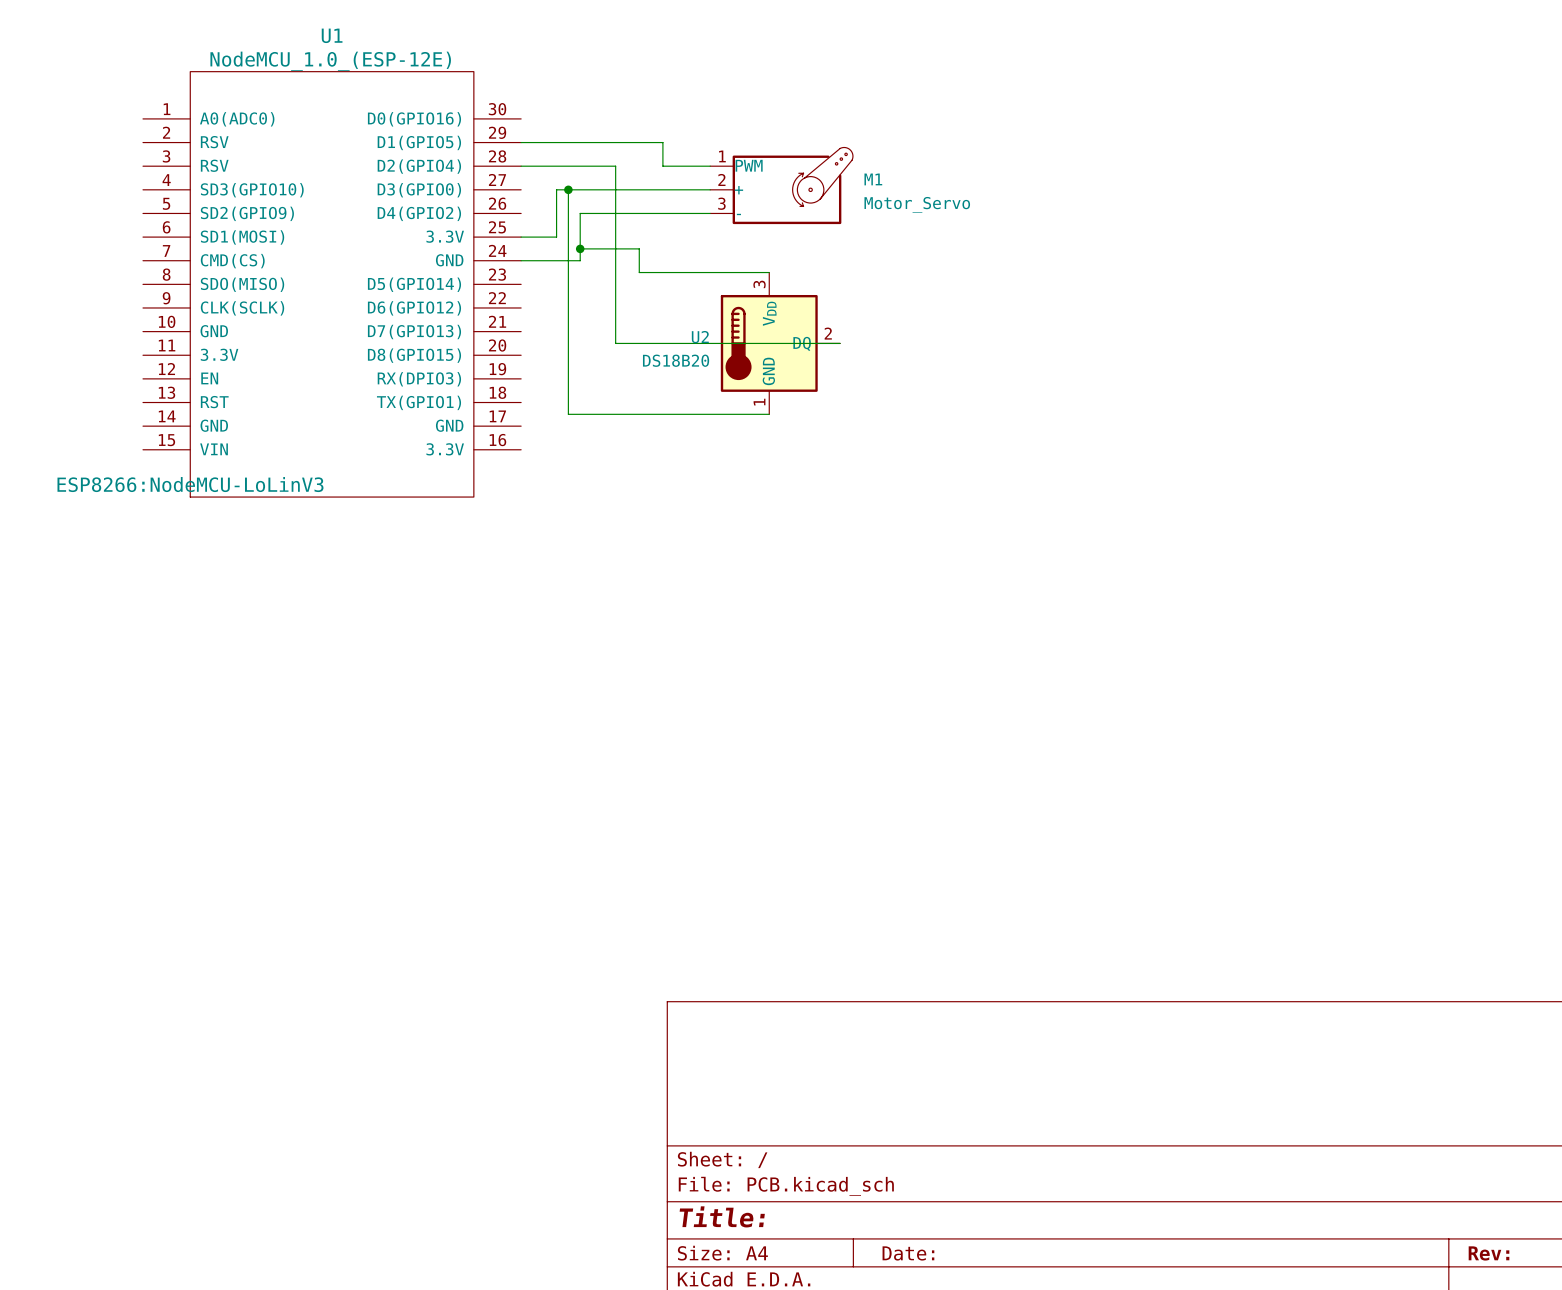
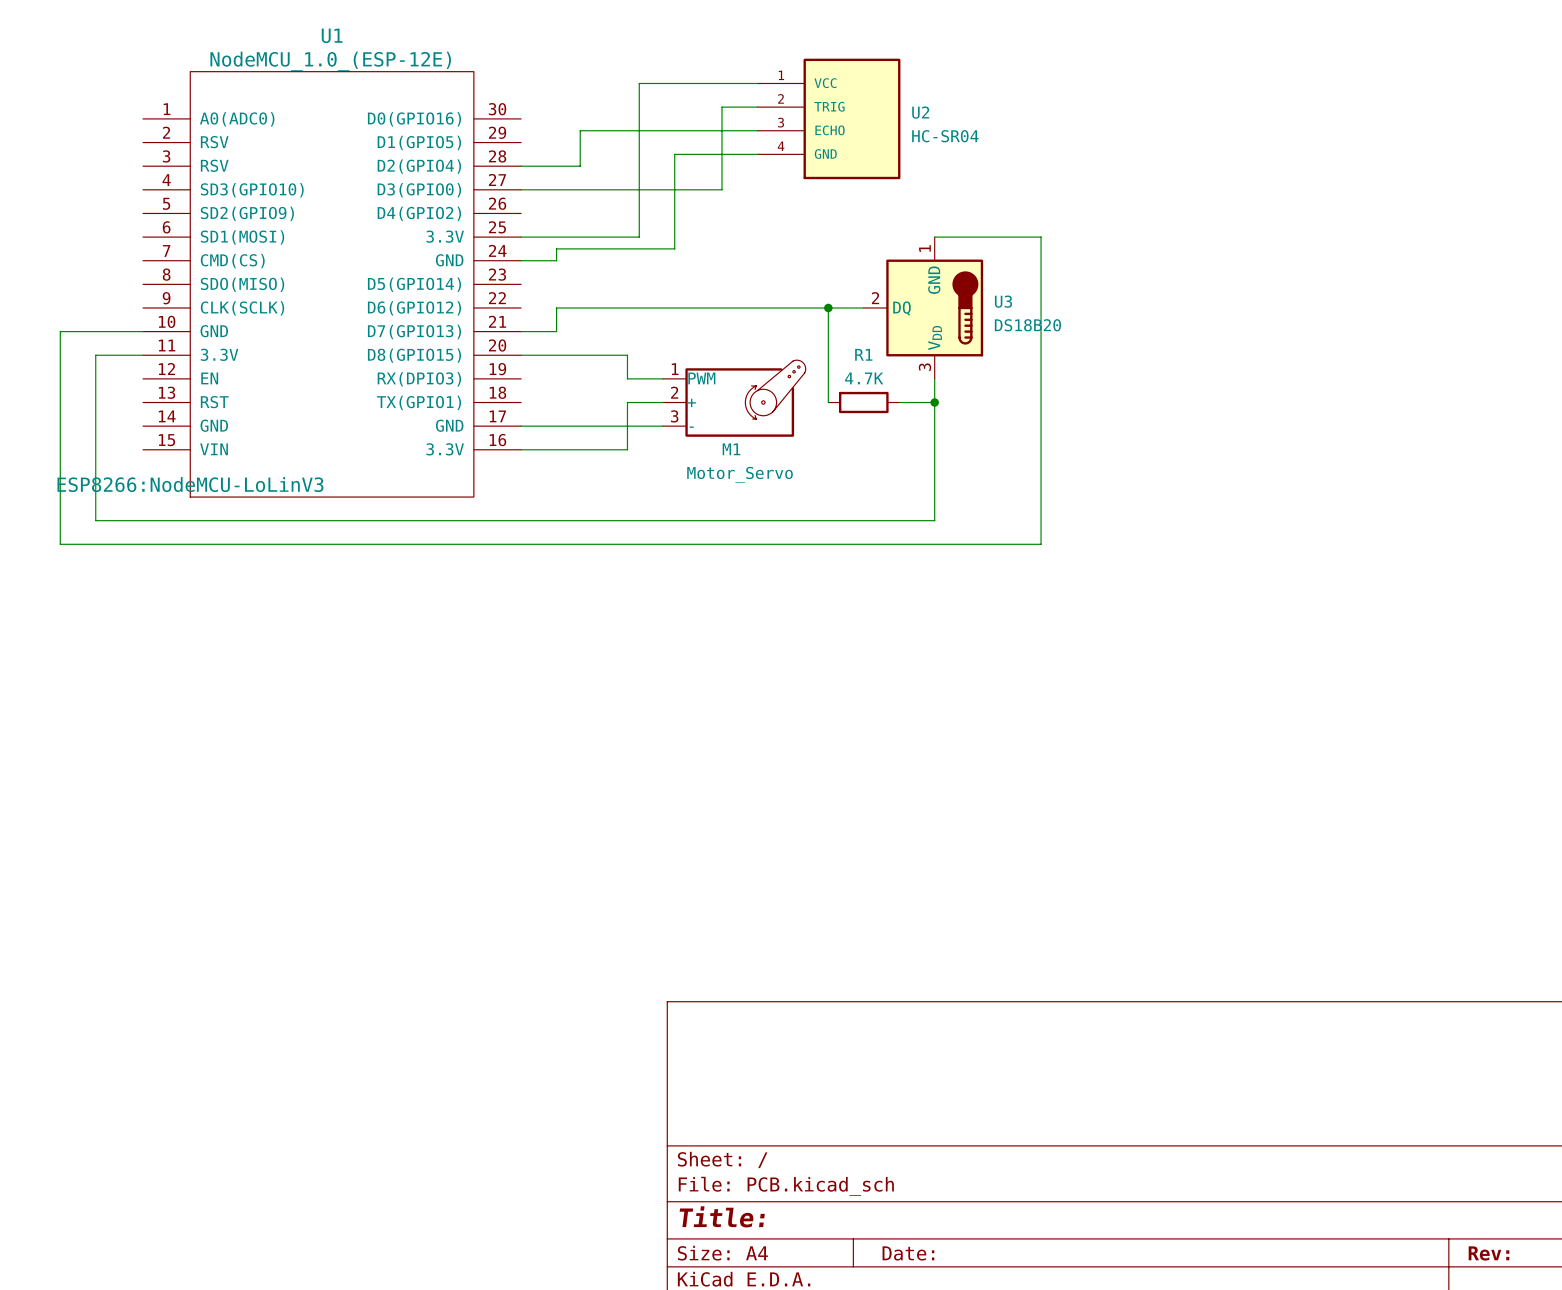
wire: none -> (757, 83) (639, 83) (639, 237) (556, 237)
wire: none -> (757, 107) (722, 107) (722, 189) (710, 189)
wire: (521, 142) (662, 142) (662, 166) (710, 166) -> none
wire: (580, 166) (615, 166) (615, 343) (840, 343) -> (580, 166) (580, 130) (757, 130)
M1 name position: M1 (873, 179) -> M1 (731, 449)
M1 position: (781, 185) -> (734, 398)
wire: (556, 189) (556, 237) -> (556, 189) (521, 189)
wire: (568, 189) (568, 414) (769, 414) -> none
junction: (568, 189) -> none
M1 value position: Motor_Servo (917, 204) -> Motor_Servo (740, 474)
wire: (710, 213) (580, 213) (580, 260) (556, 260) -> (580, 248) (556, 248) (556, 260)
wire: none -> (934, 237) (1041, 237) (1041, 544) (60, 544) (60, 331) (143, 331)
junction: (580, 248) -> none
wire: (639, 248) (639, 272) (769, 272) -> (639, 248) (674, 248) (674, 154) (757, 154)
U2 symbol: [720, 272, 841, 415] -> [757, 58, 901, 180]
wire: none -> (828, 307) (828, 402)
junction: none -> (828, 307)
wire: none -> (863, 307) (556, 307) (556, 331) (521, 331)
U3: none -> DS18B20 (923, 307)
U2 name position: U2 (700, 337) -> U2 (920, 112)
wire: none -> (143, 355) (95, 355) (95, 520) (934, 520) (934, 378)
wire: none -> (521, 355) (627, 355) (627, 378) (662, 378)
U2 value: DS18B20 (676, 360) -> HC-SR04 (945, 136)
wire: none -> (662, 402) (627, 402) (627, 449) (521, 449)
R1: none -> 4.7K (863, 402)
wire: none -> (899, 402) (934, 402)
junction: none -> (934, 402)
wire: none -> (521, 426) (662, 426)

